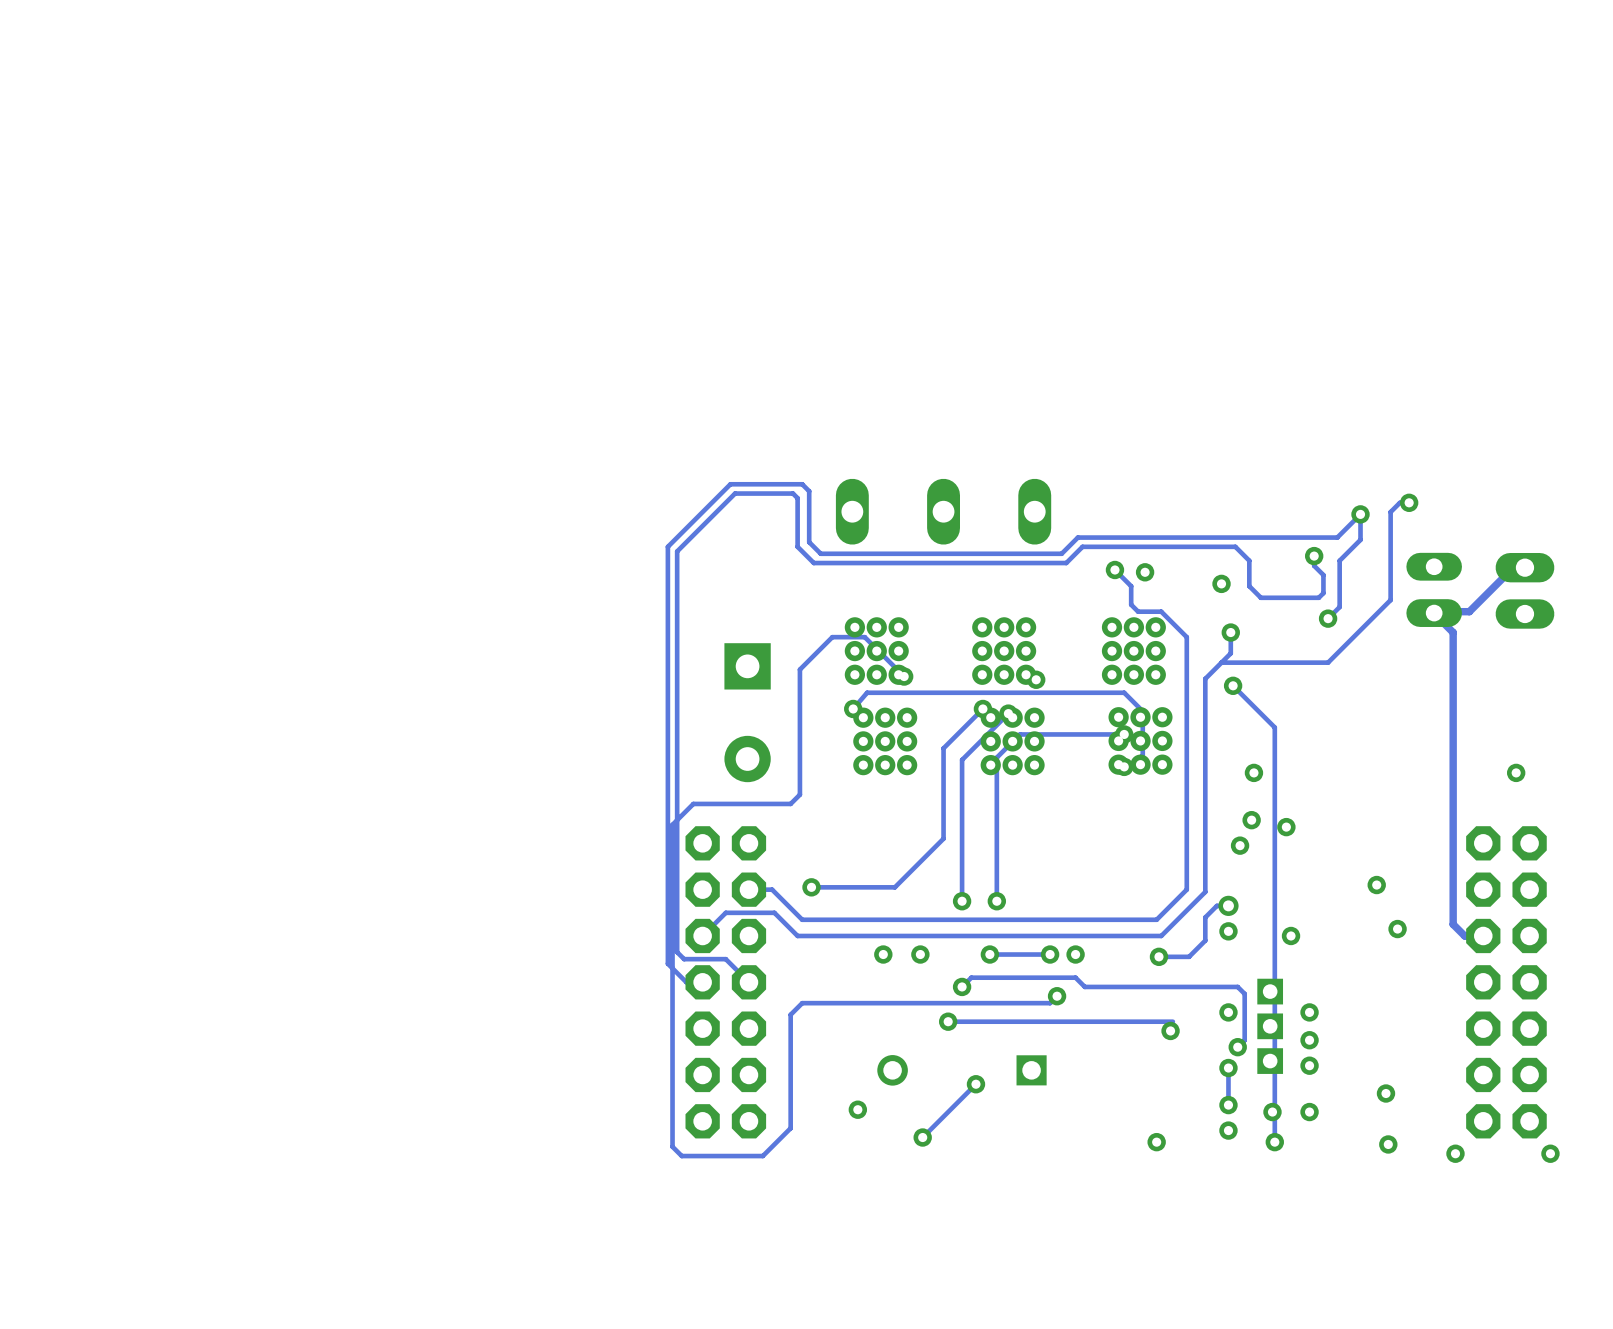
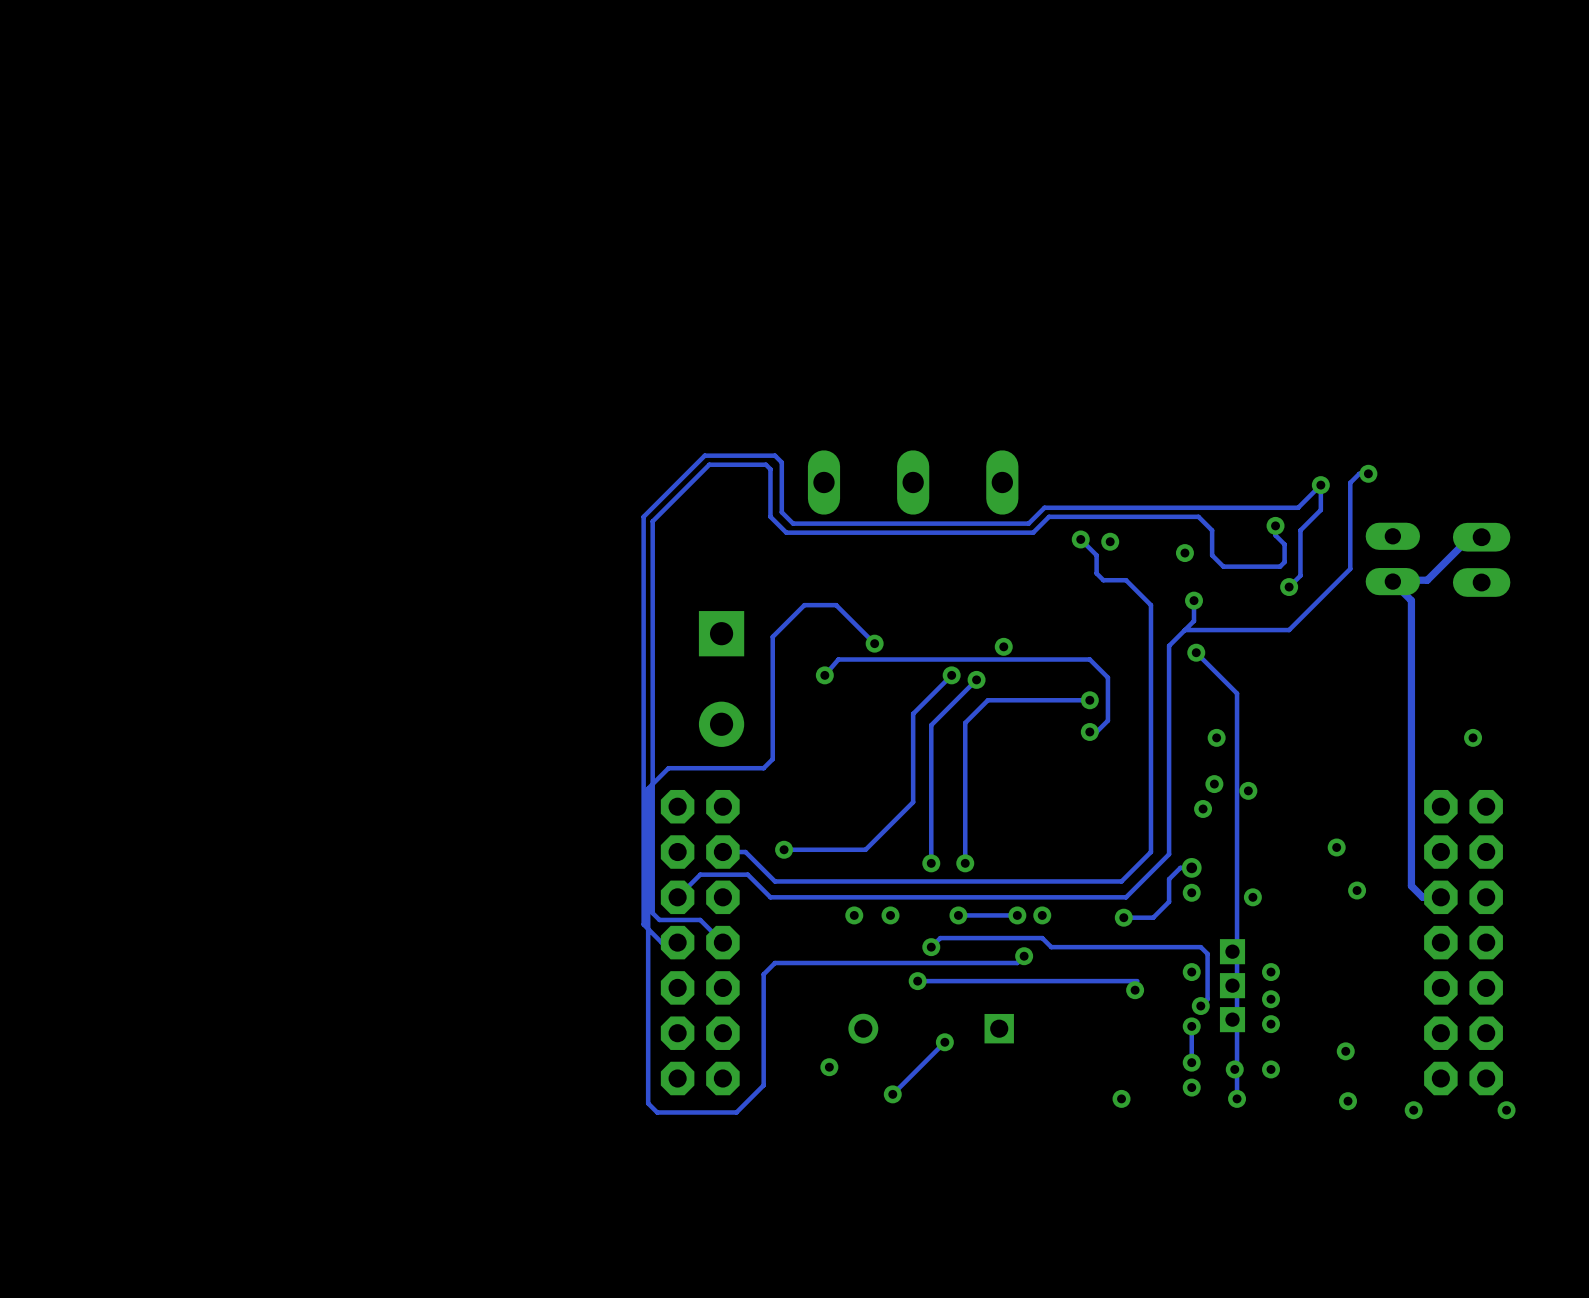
part: (876, 651) -> none
part: (1004, 651) -> none
part: (1133, 651) -> none
part: (1140, 740) -> none
part: (885, 741) -> none
part: (1012, 741) -> none

